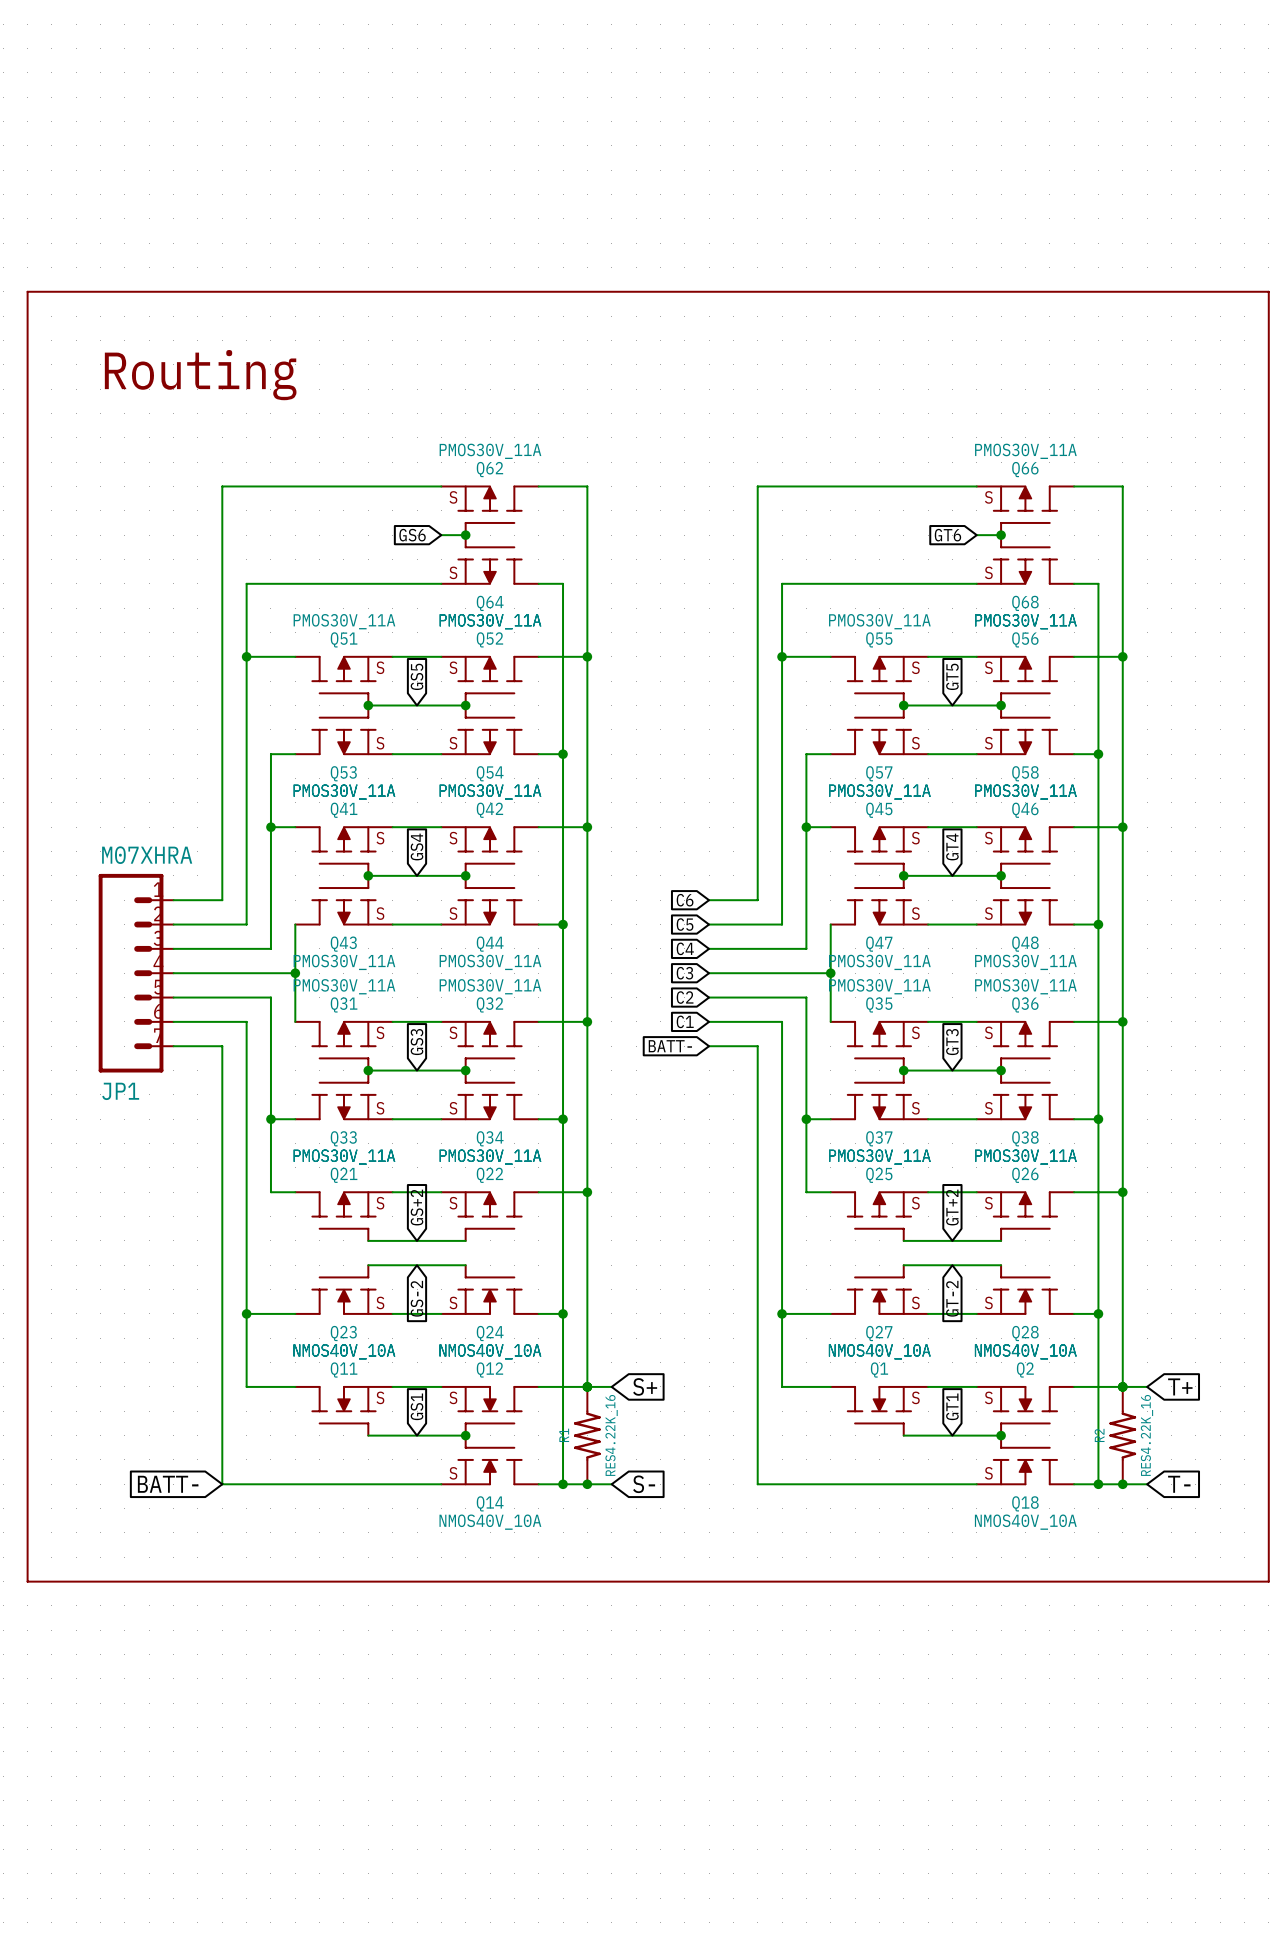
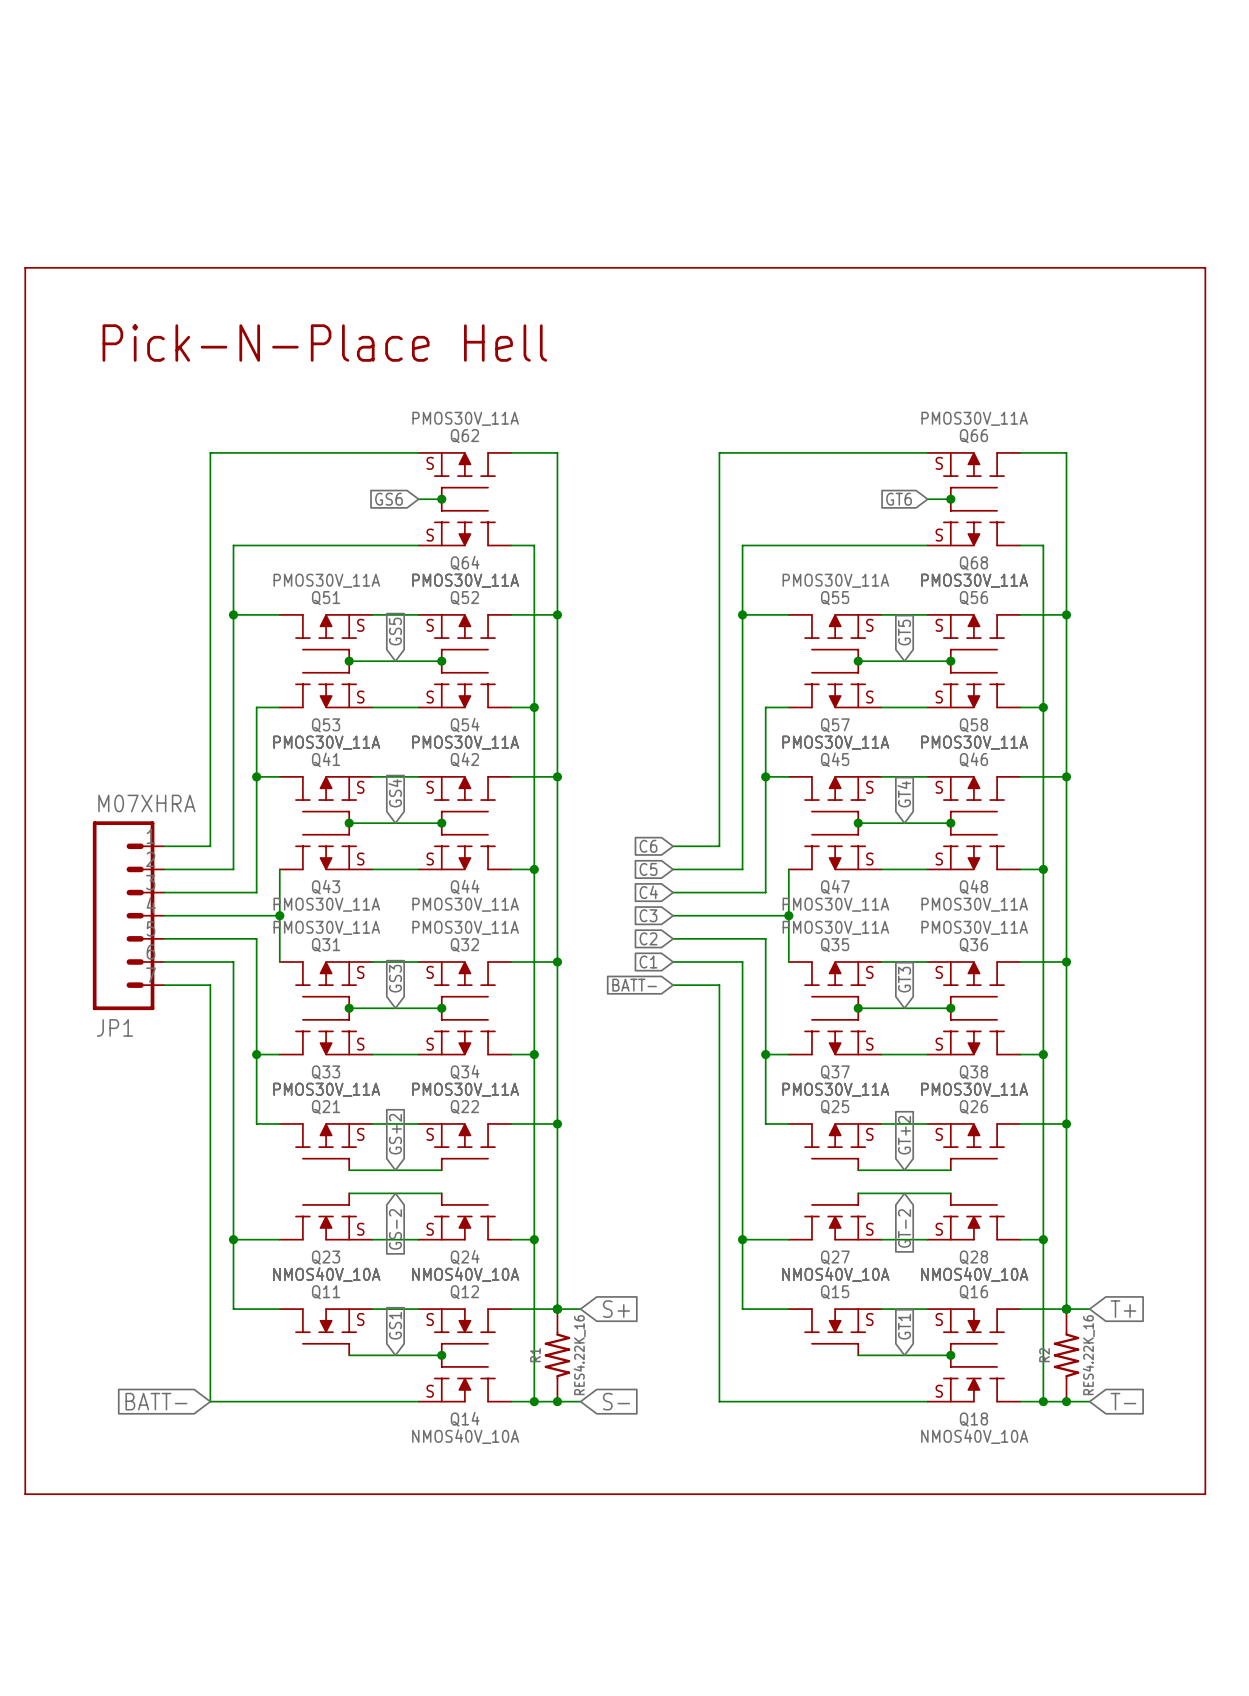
text: Routing (200, 375) -> Pick-N-Place Hell (324, 343)
Q1 name: Q1 (879, 1370) -> Q15 (835, 1292)
Q2 name: Q2 (1025, 1370) -> Q16 (973, 1292)

